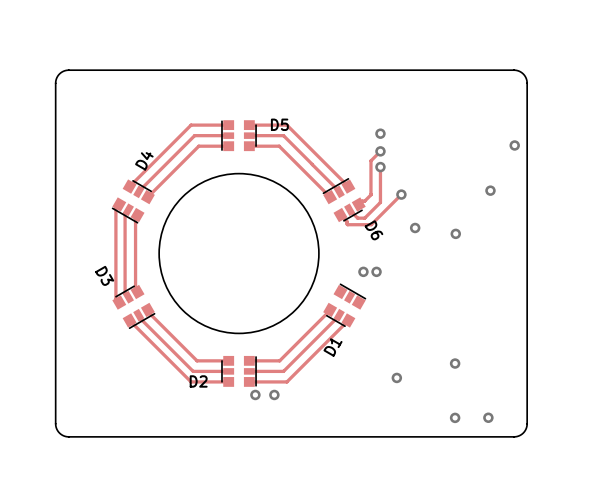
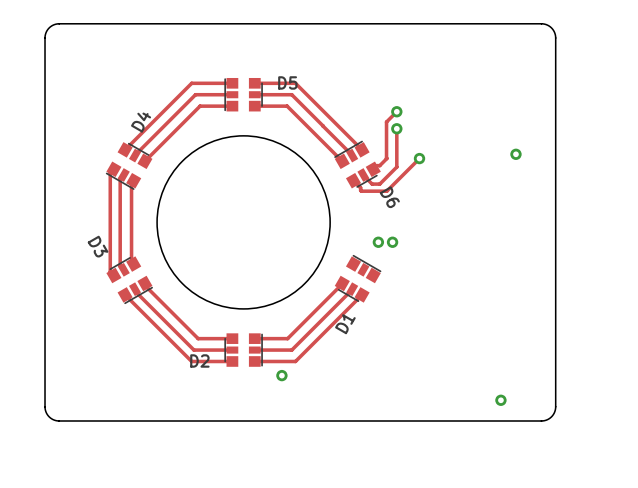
via: (380, 133) -> none
via: (514, 145) -> none
via: (415, 227) -> none
via: (455, 233) -> none
via: (455, 363) -> none
via: (396, 377) -> none
via: (255, 394) -> none
via: (455, 417) -> none
via: none -> (500, 400)
via: (488, 417) -> none

